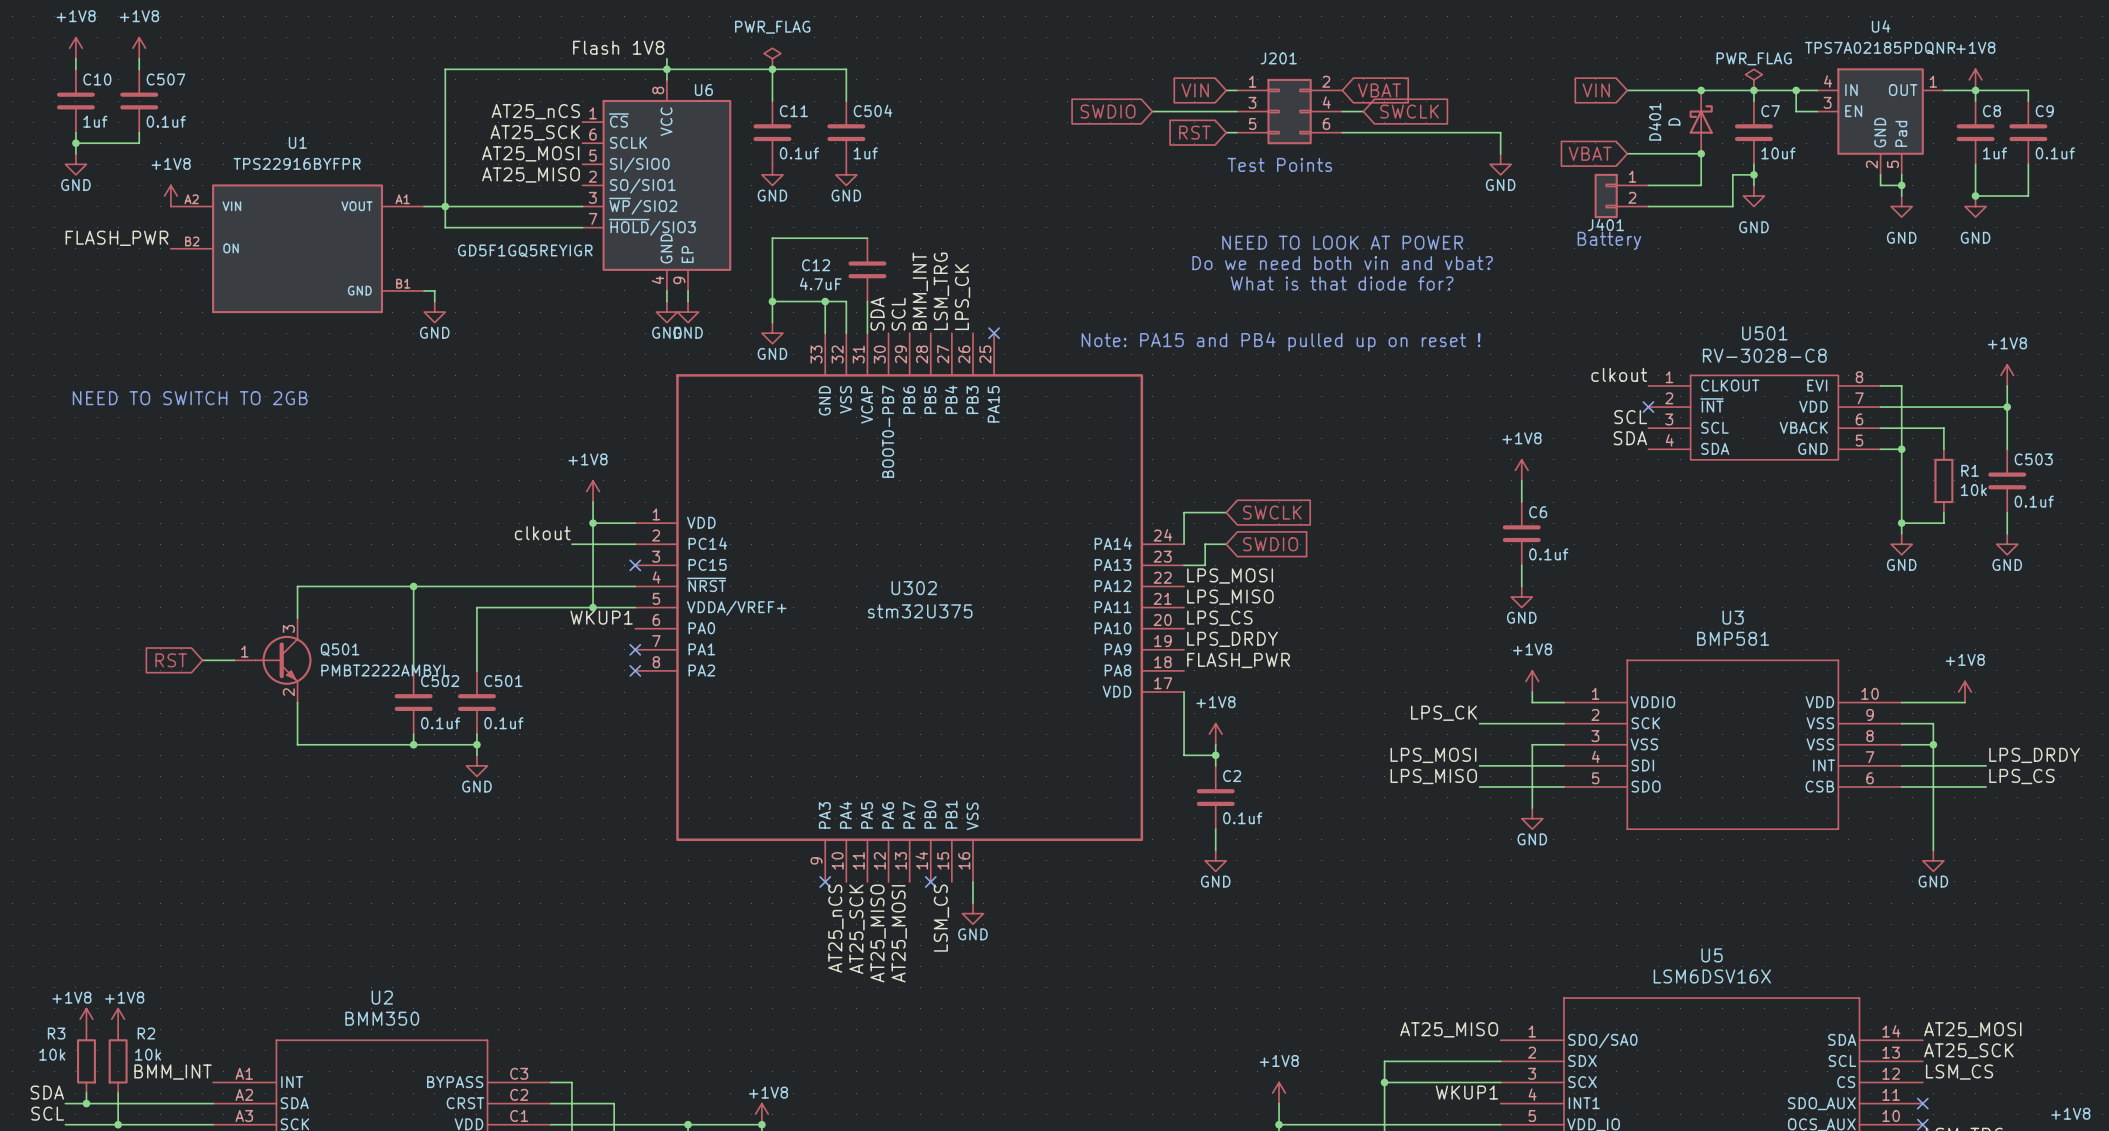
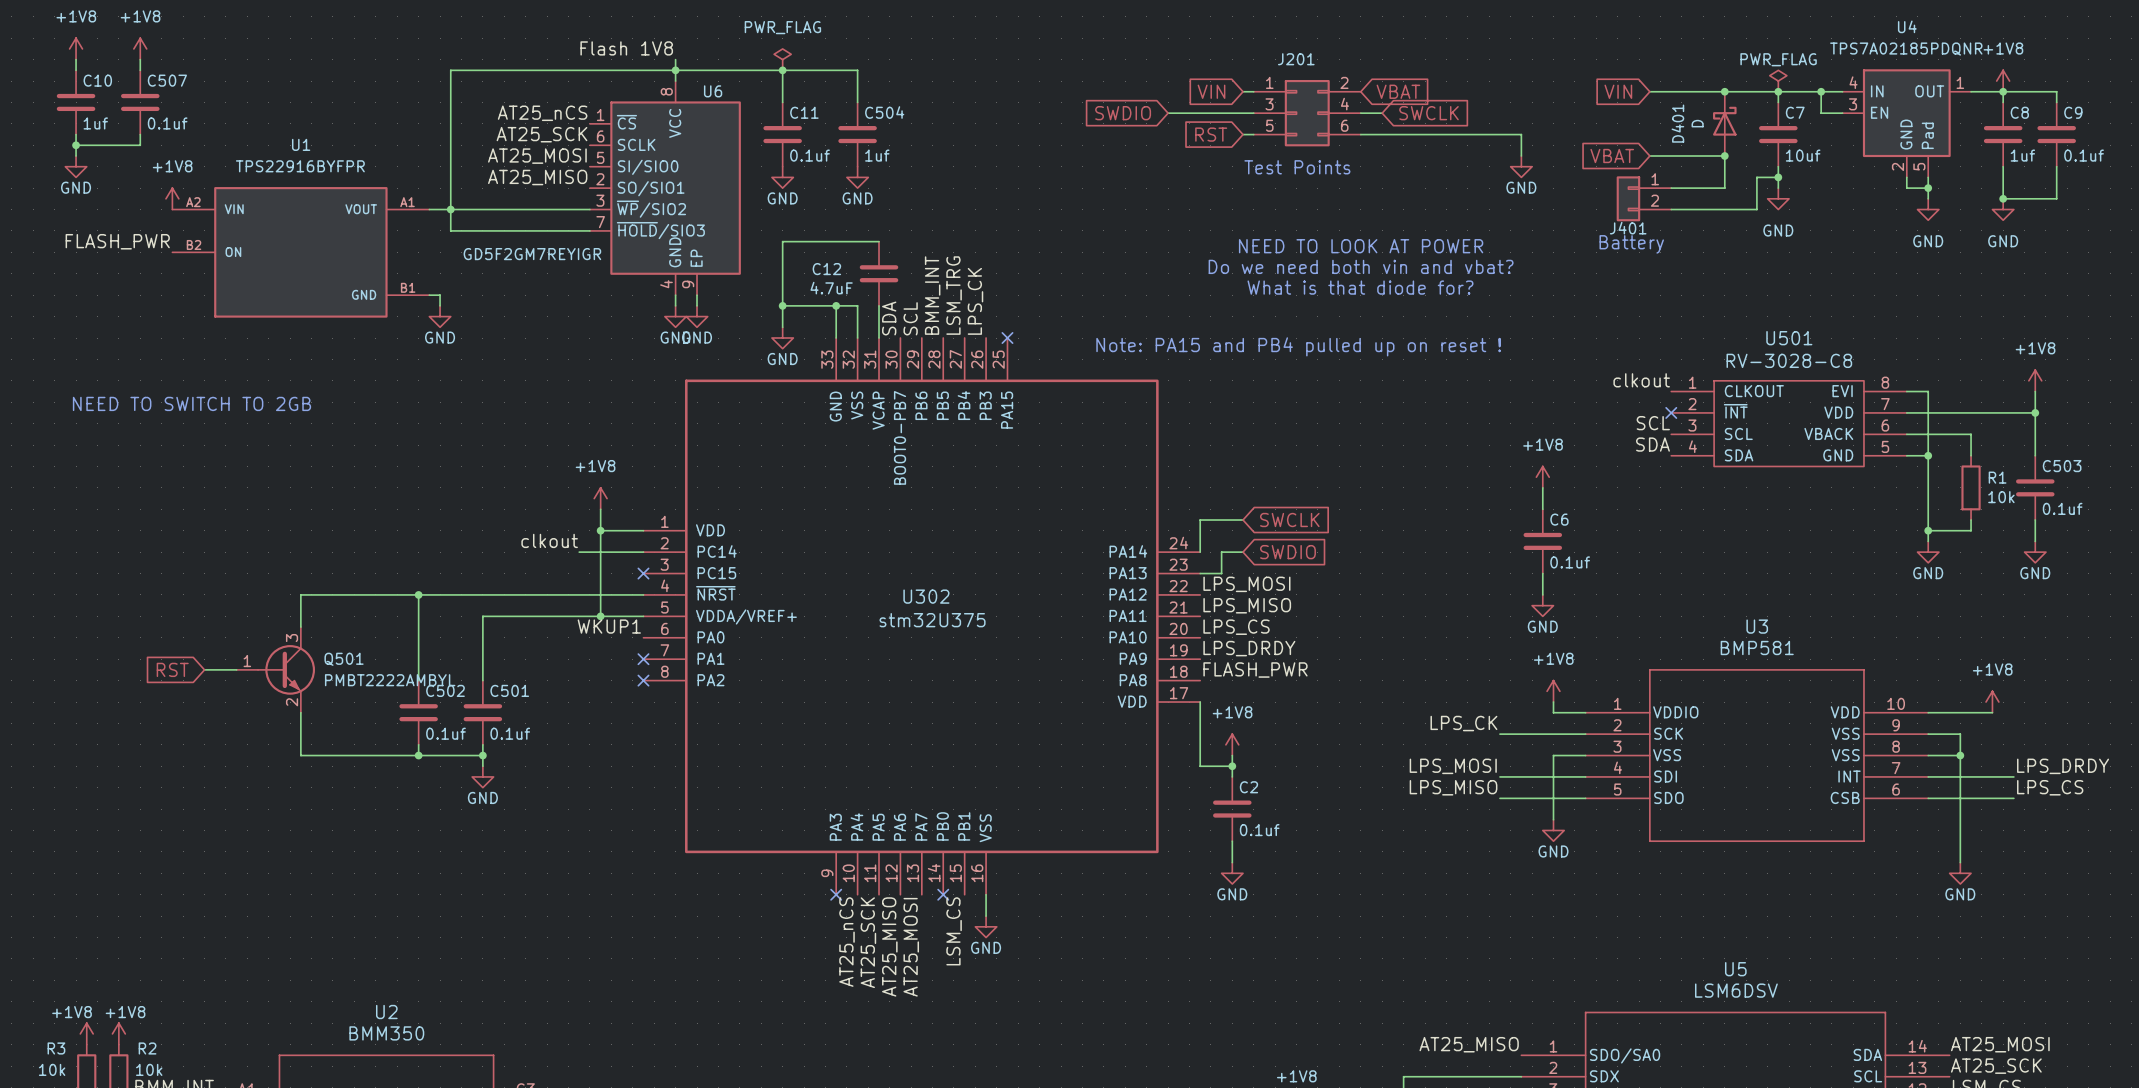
U6 value: GD5F1GQ5REYIGR (525, 250) -> GD5F2GM7REYIGR (532, 254)
U5 value: LSM6DSV16X (1712, 976) -> LSM6DSV (1736, 990)

